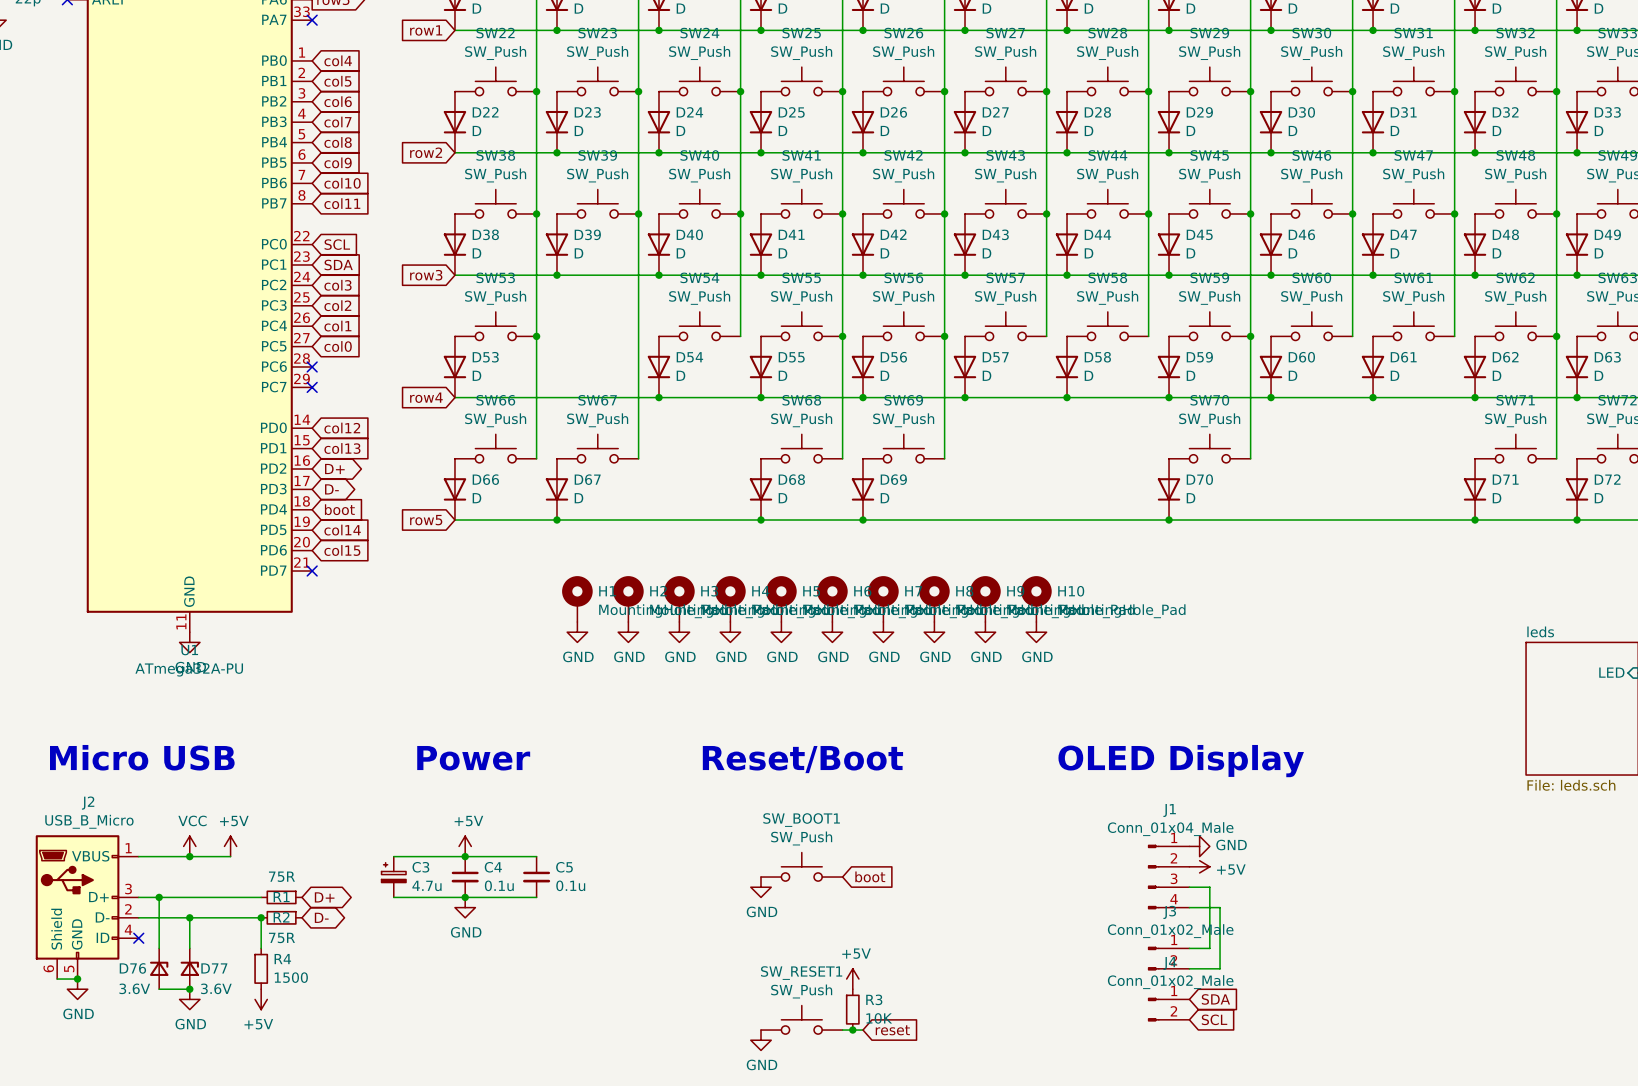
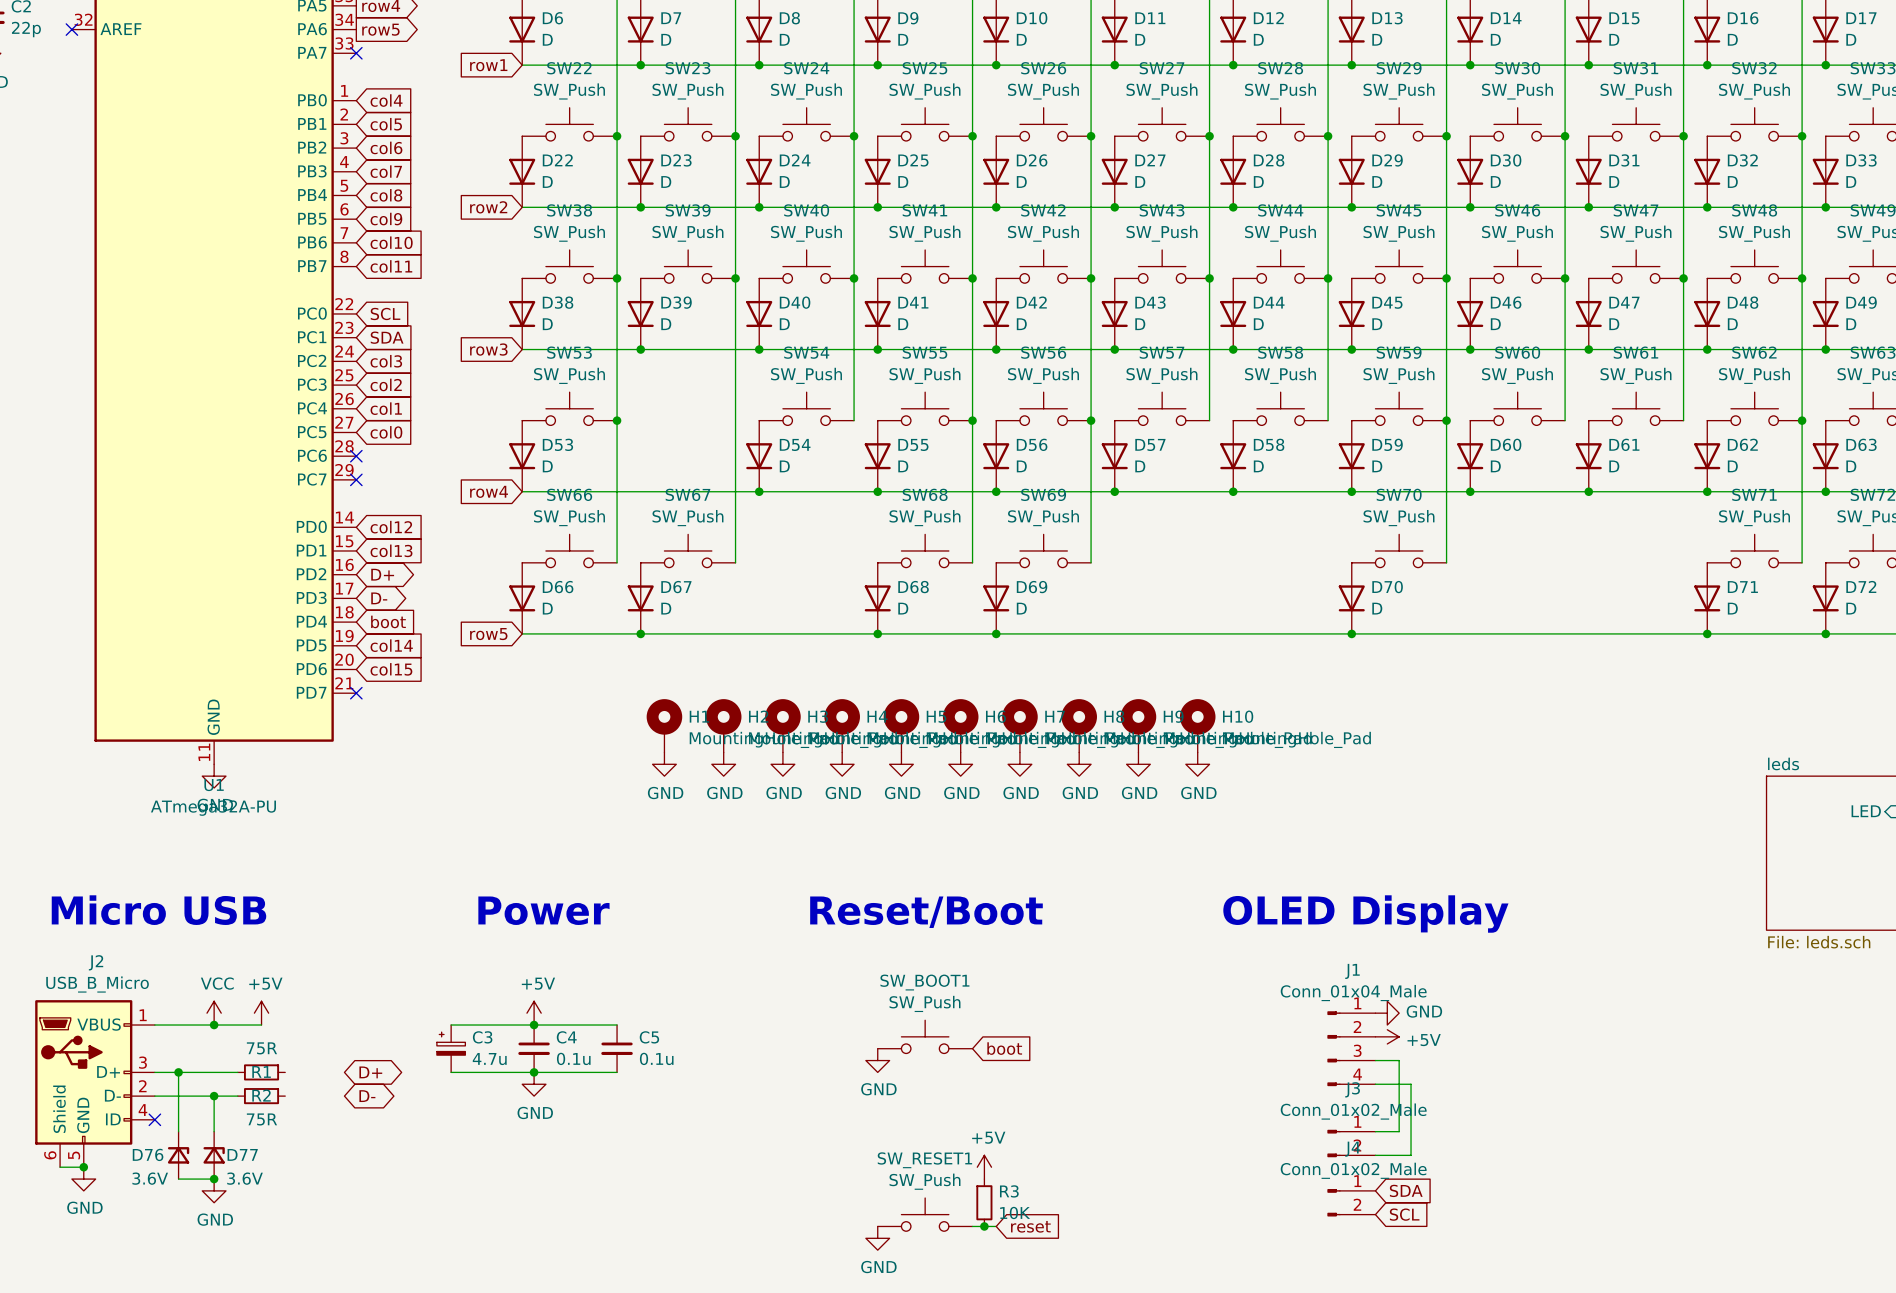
wire: (210, 897) (261, 897) -> none
R1 position: (281, 897) -> (261, 1072)
wire: (210, 917) (261, 917) (261, 948) -> none
junction: (261, 917) -> none
R2 position: (281, 917) -> (261, 1096)
R4: 1500 (261, 968) -> none
power symbol: +5V (261, 999) -> none

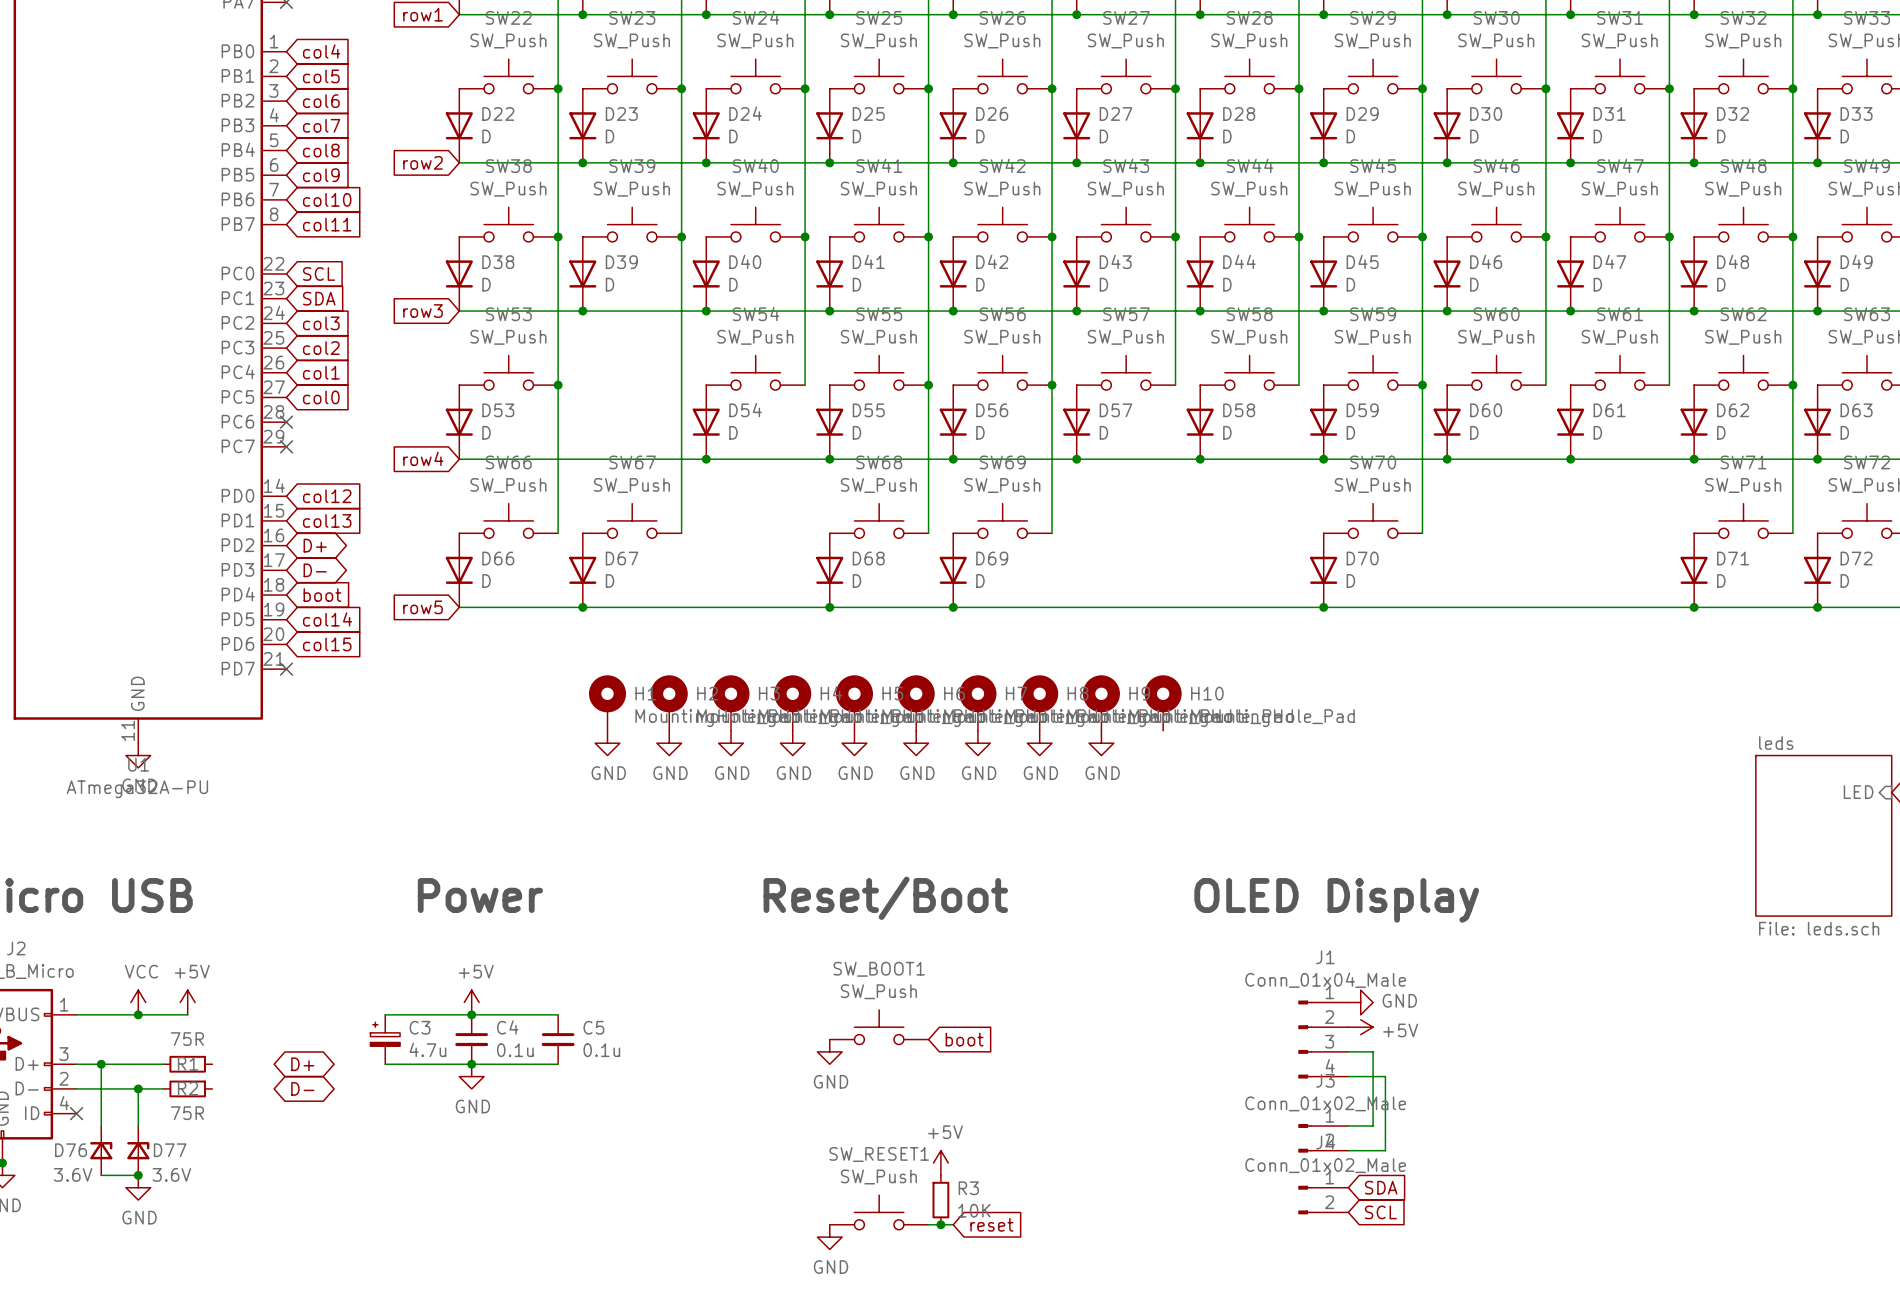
power symbol: GND (1197, 764) -> none

